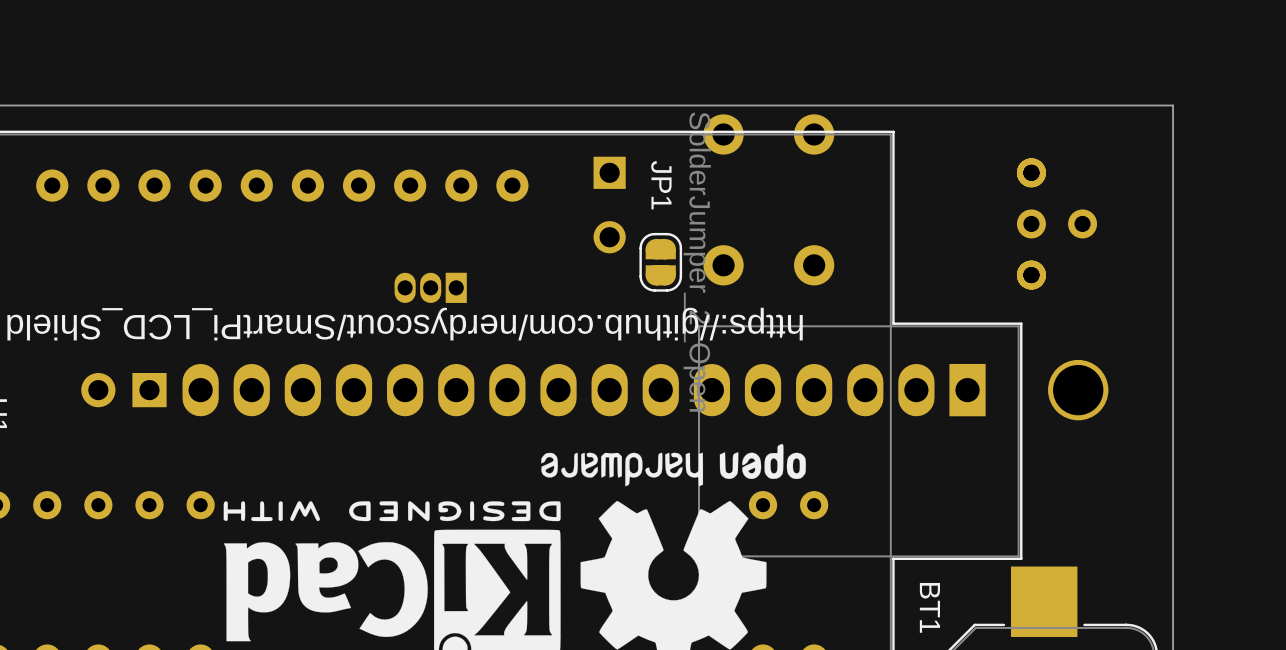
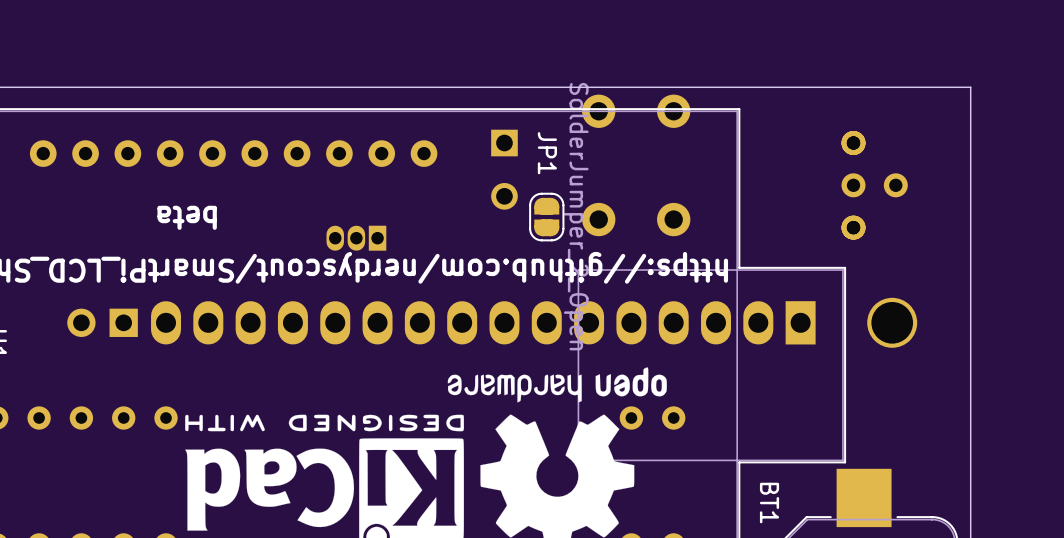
text: none -> beta (187, 217)

